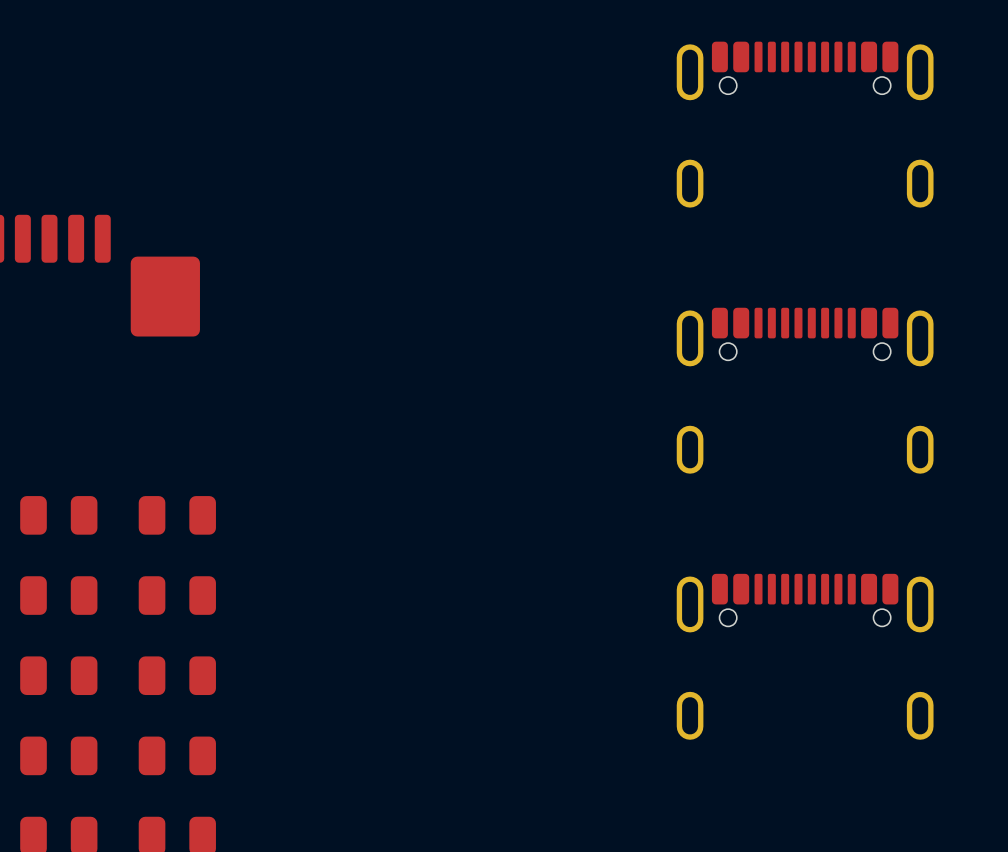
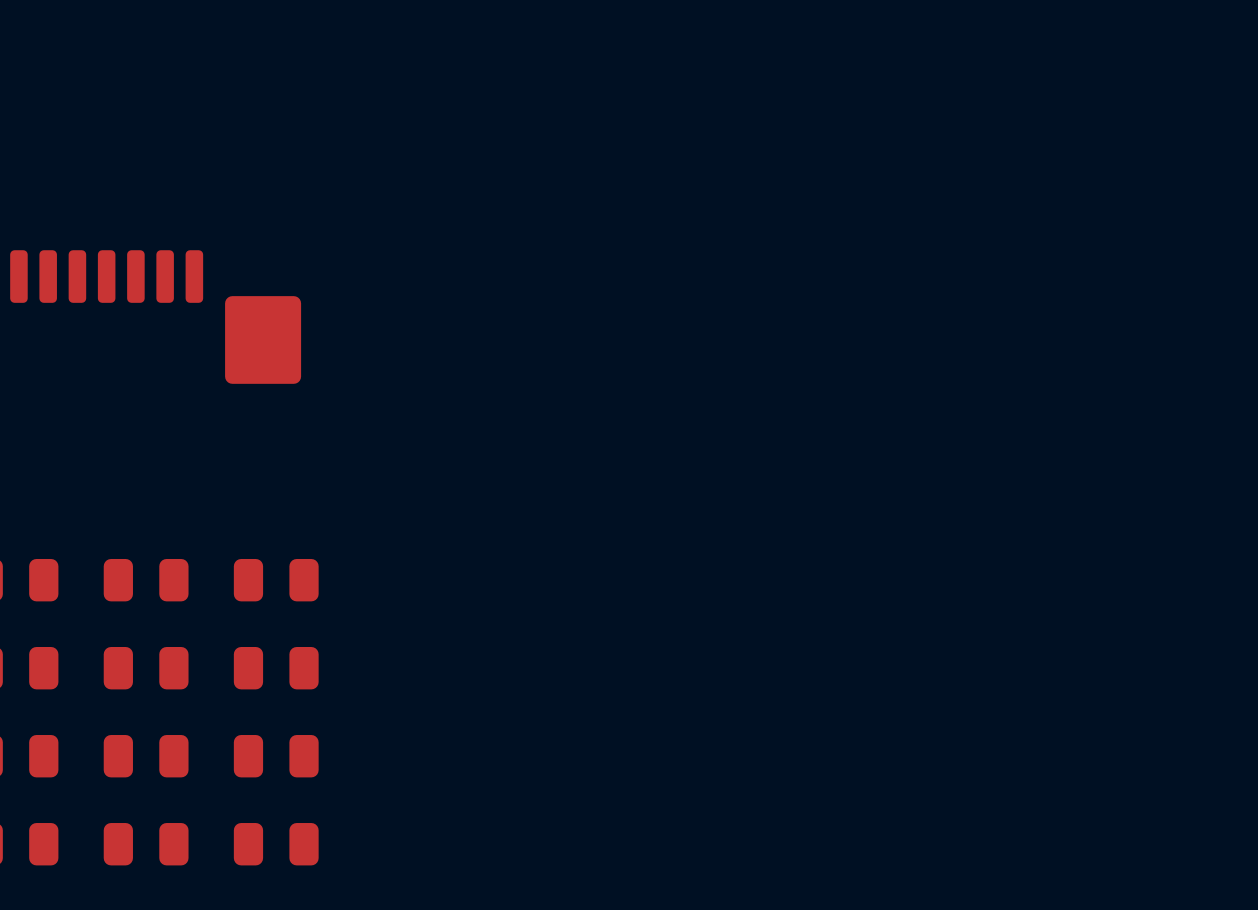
part: (805, 124) -> none
part: (805, 390) -> none
part: (805, 656) -> none

